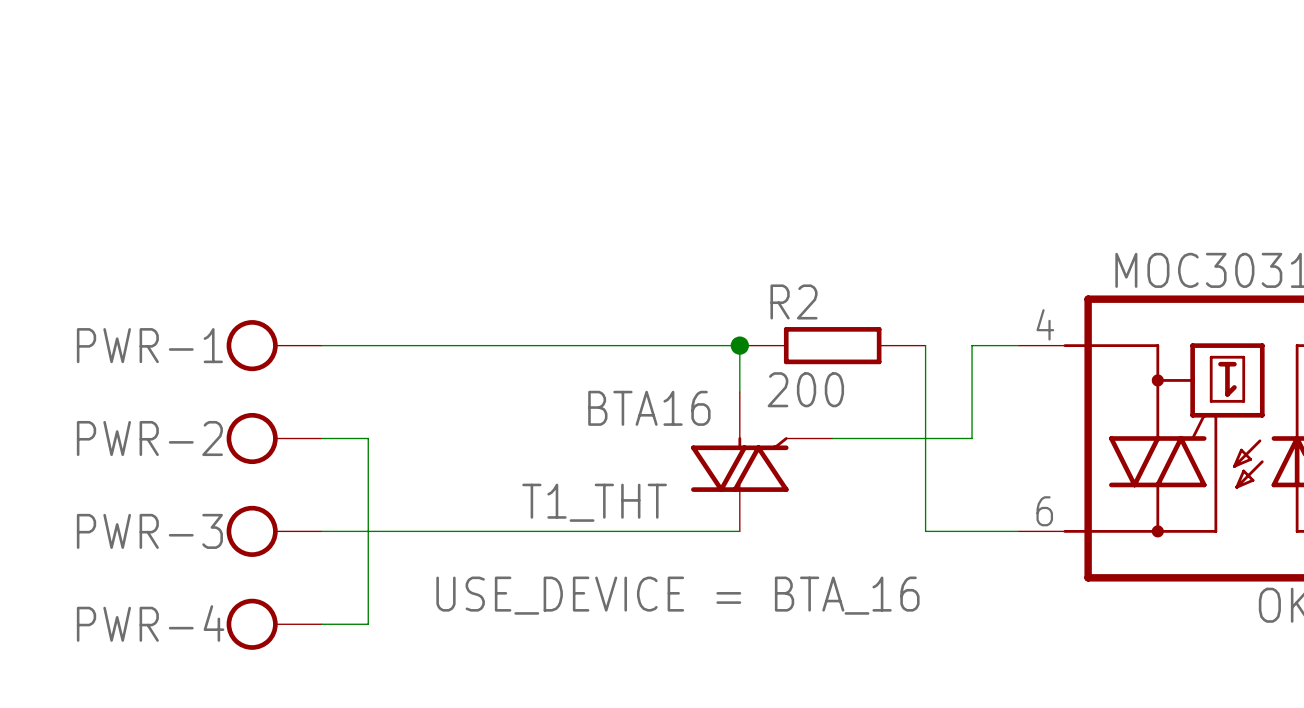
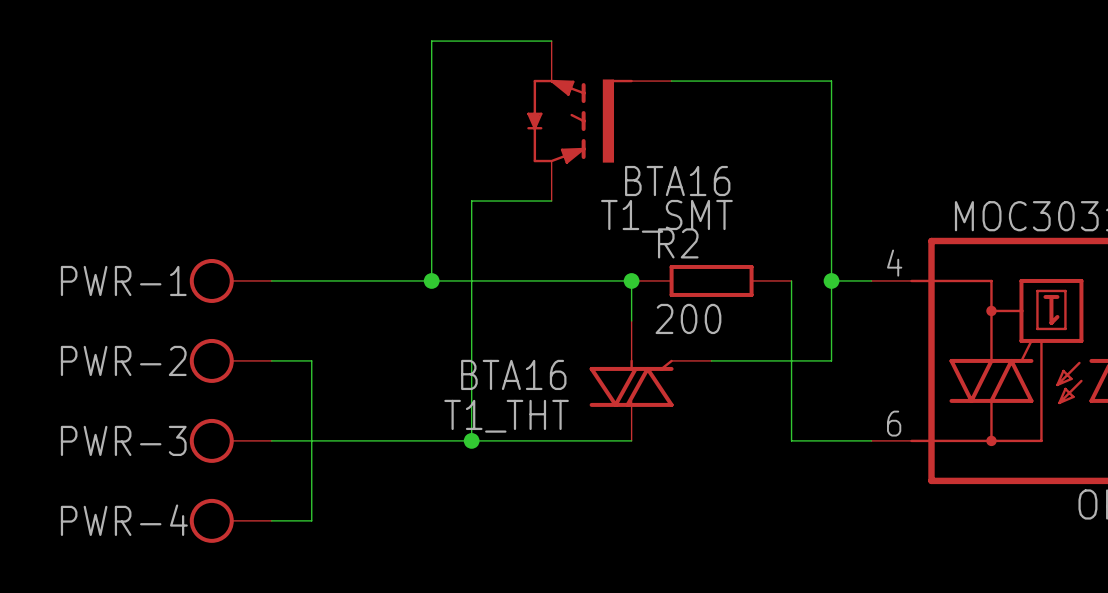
wire: none -> (551, 41) (431, 41) (431, 280)
wire: none -> (671, 81) (831, 81) (831, 280)
T1_SMT: none -> BTA16 (599, 121)
wire: none -> (551, 201) (471, 201) (471, 440)
junction: none -> (431, 280)
junction: none -> (831, 280)
T1_THT value position: BTA16 (649, 408) -> BTA16 (513, 374)
junction: none -> (471, 440)
T1_THT text: USE_DEVICE = BTA_16 (677, 595) -> none

